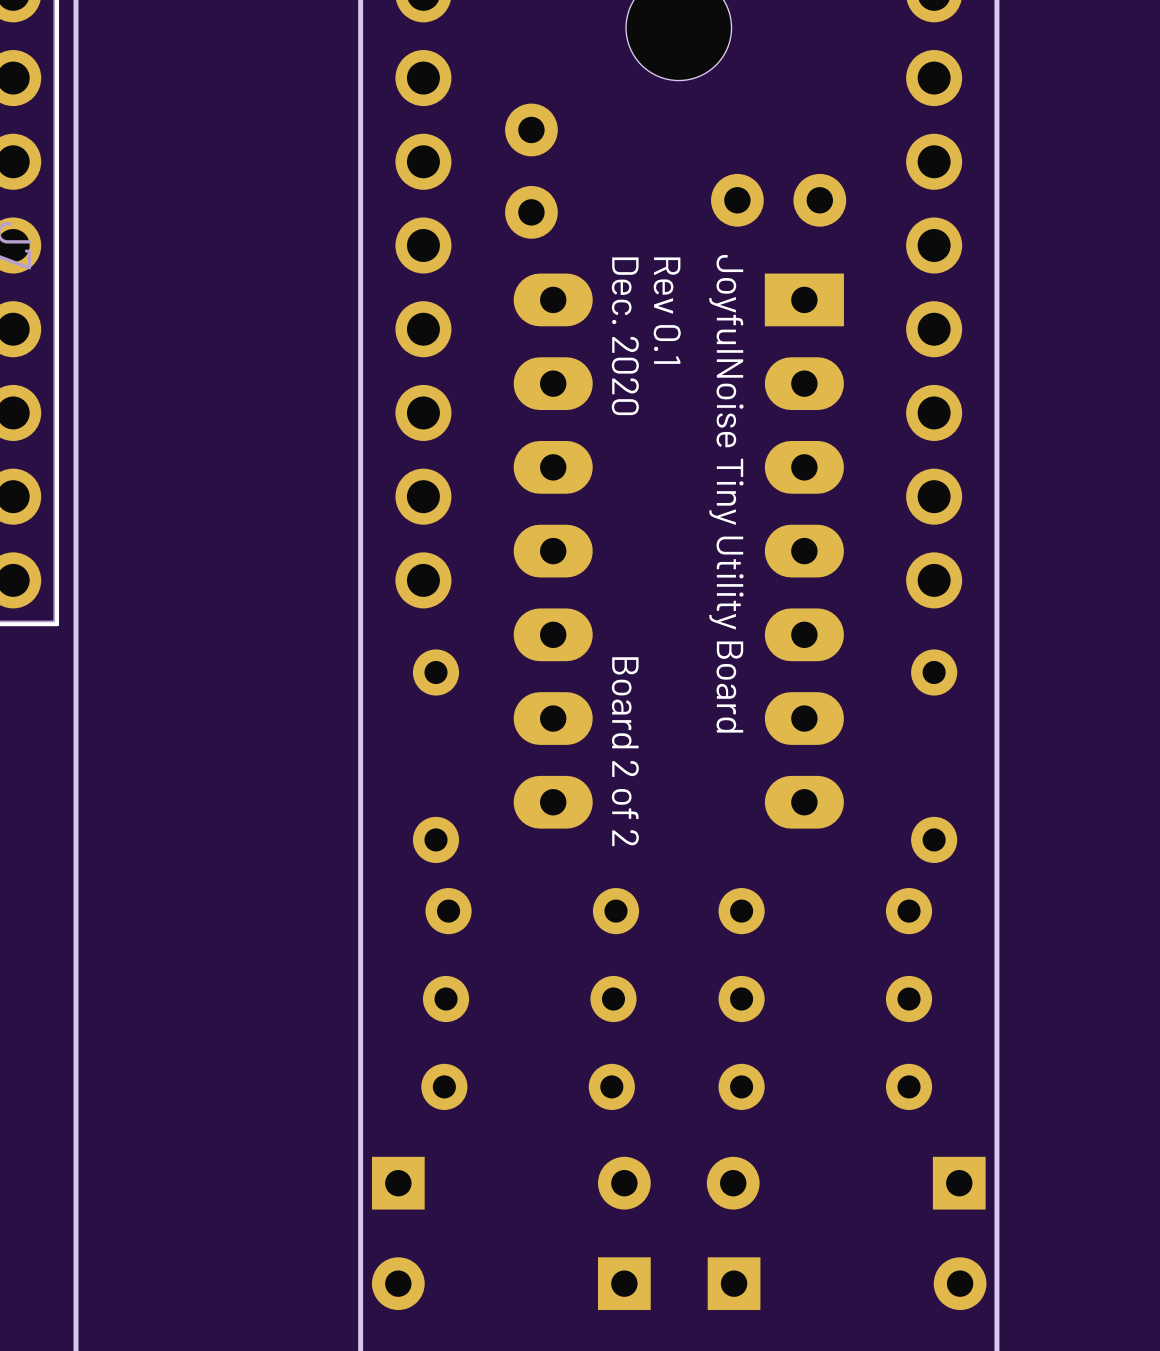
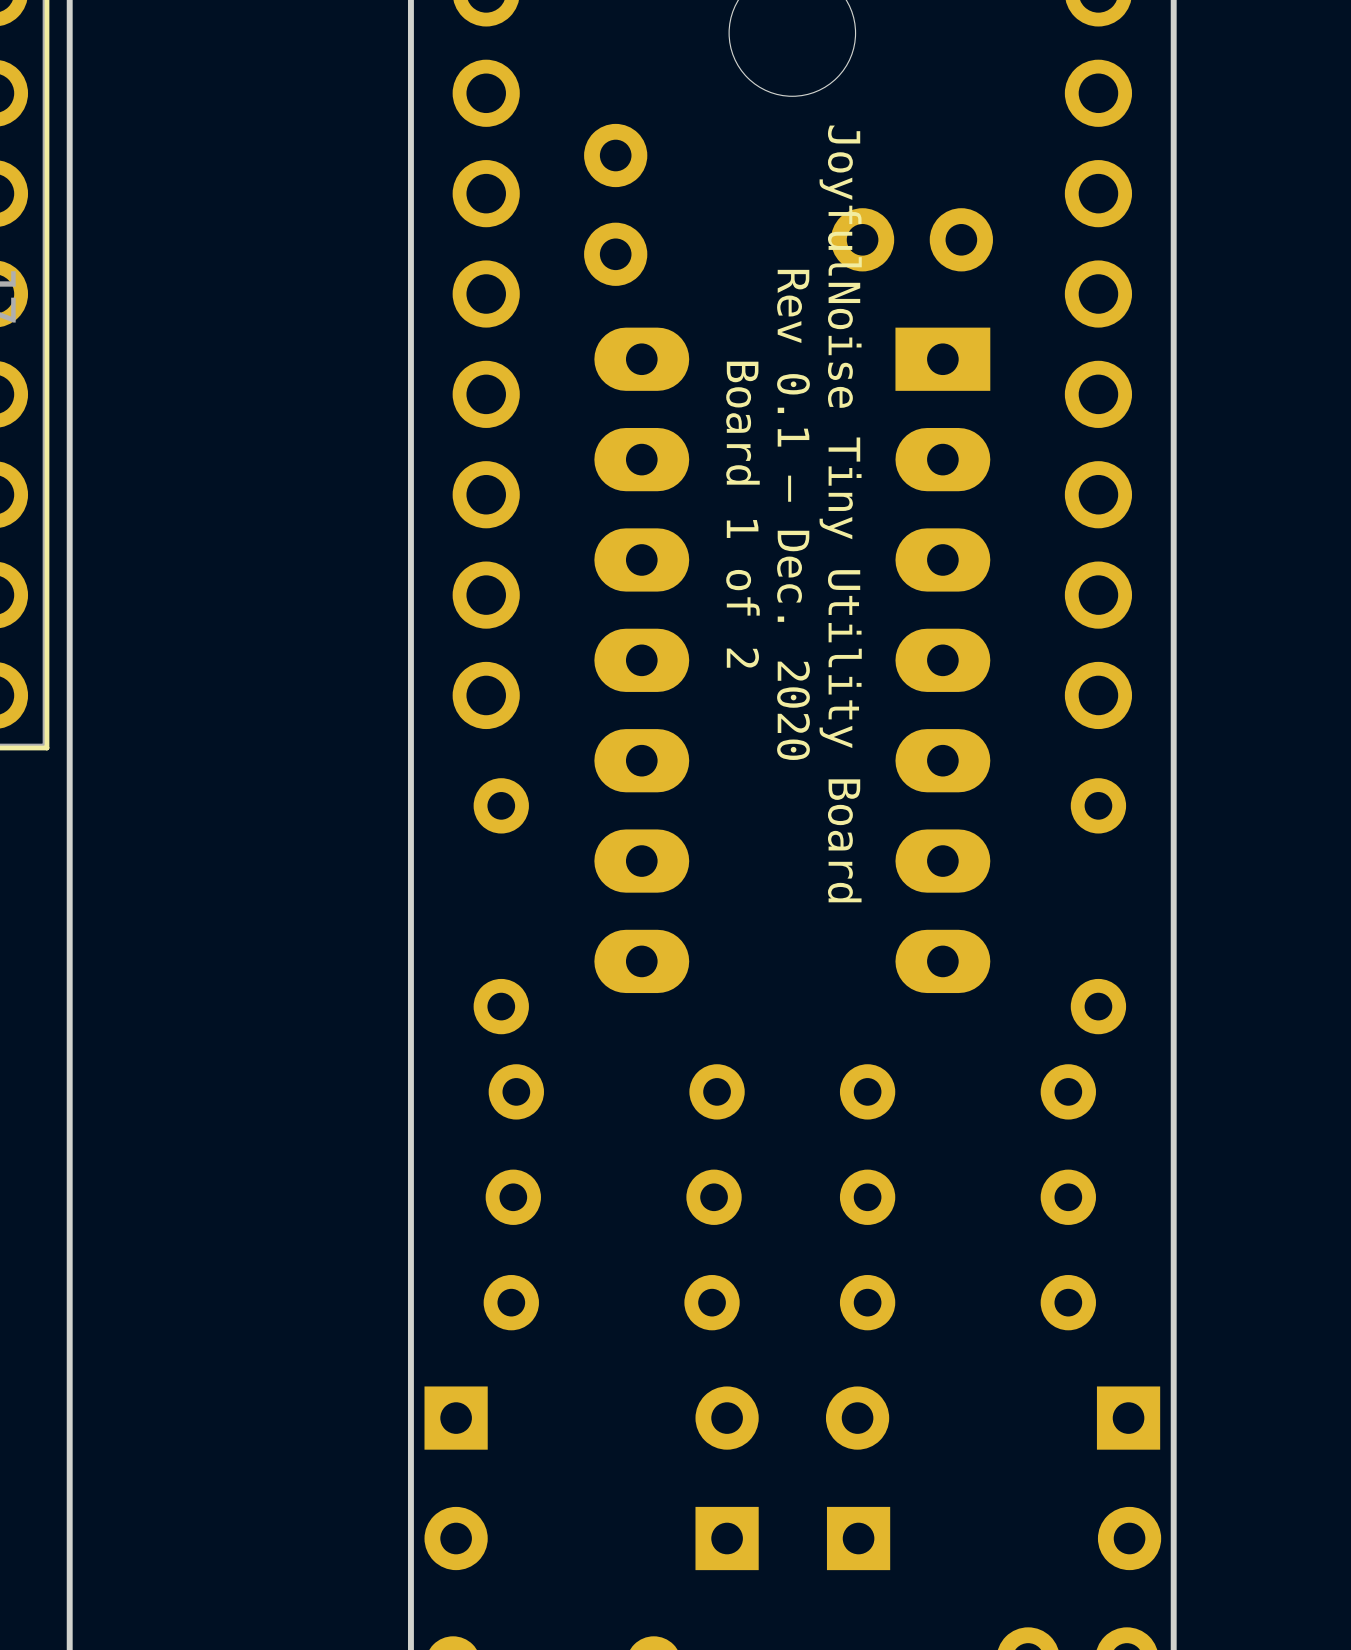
text: Rev 0.1 (667, 310) -> none
text: Dec. 2020 (625, 336) -> Rev 0.1 — Dec. 2020 (793, 514)
text position: JoyfulNoise Tiny Utility Board (726, 493) -> JoyfulNoise Tiny Utility Board (840, 513)
text: Board 2 of 2 (625, 751) -> Board 1 of 2 (742, 514)

